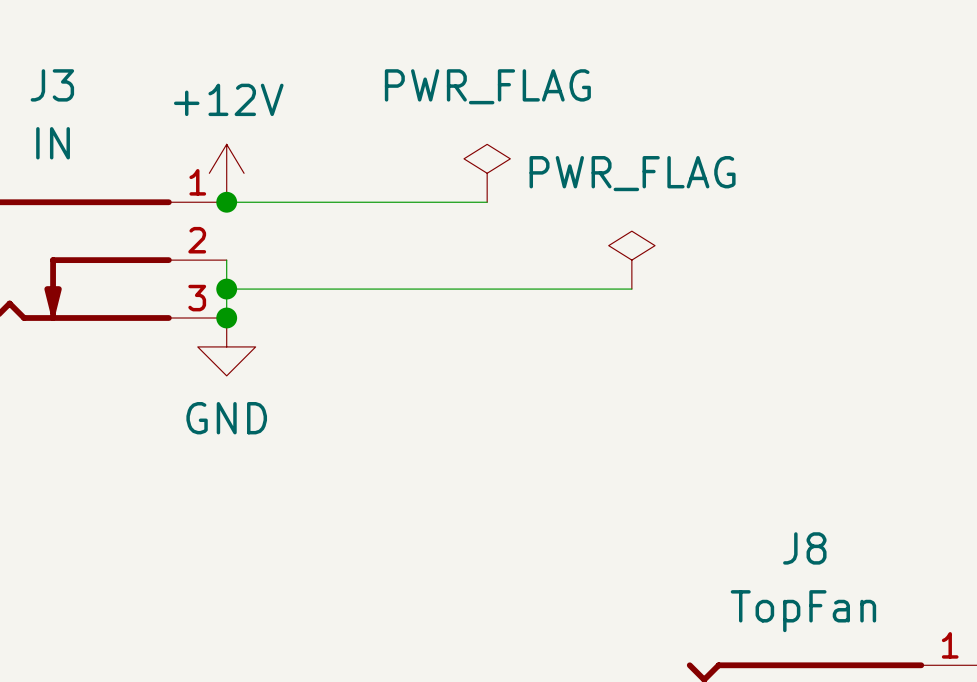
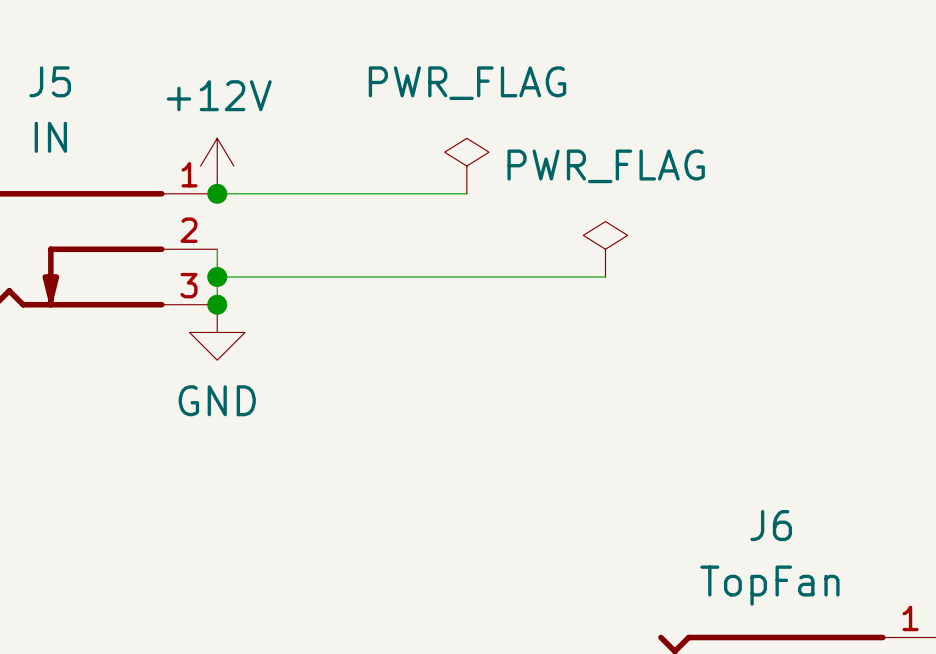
J3 name: J3 (52, 85) -> J5 (50, 81)
J8 name: J8 (804, 548) -> J6 (771, 525)

